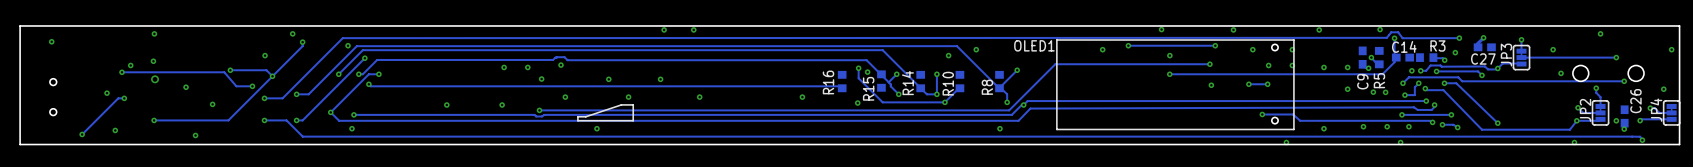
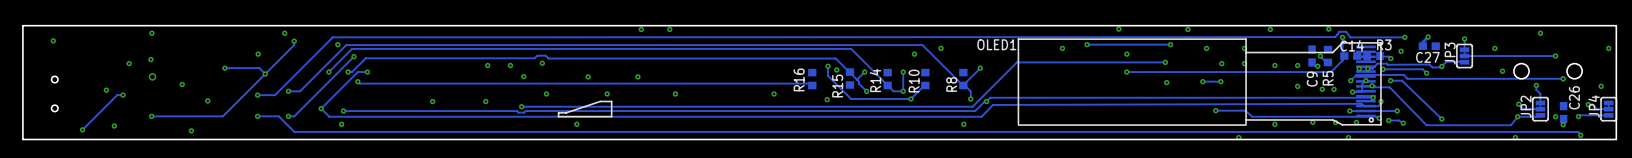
OLED1 footprint: [1056, 39, 1295, 130] -> [1017, 38, 1382, 126]
track: (122, 72) (224, 72) (236, 86) (252, 86) -> none
via: (122, 72) -> none
via: (252, 86) -> none

